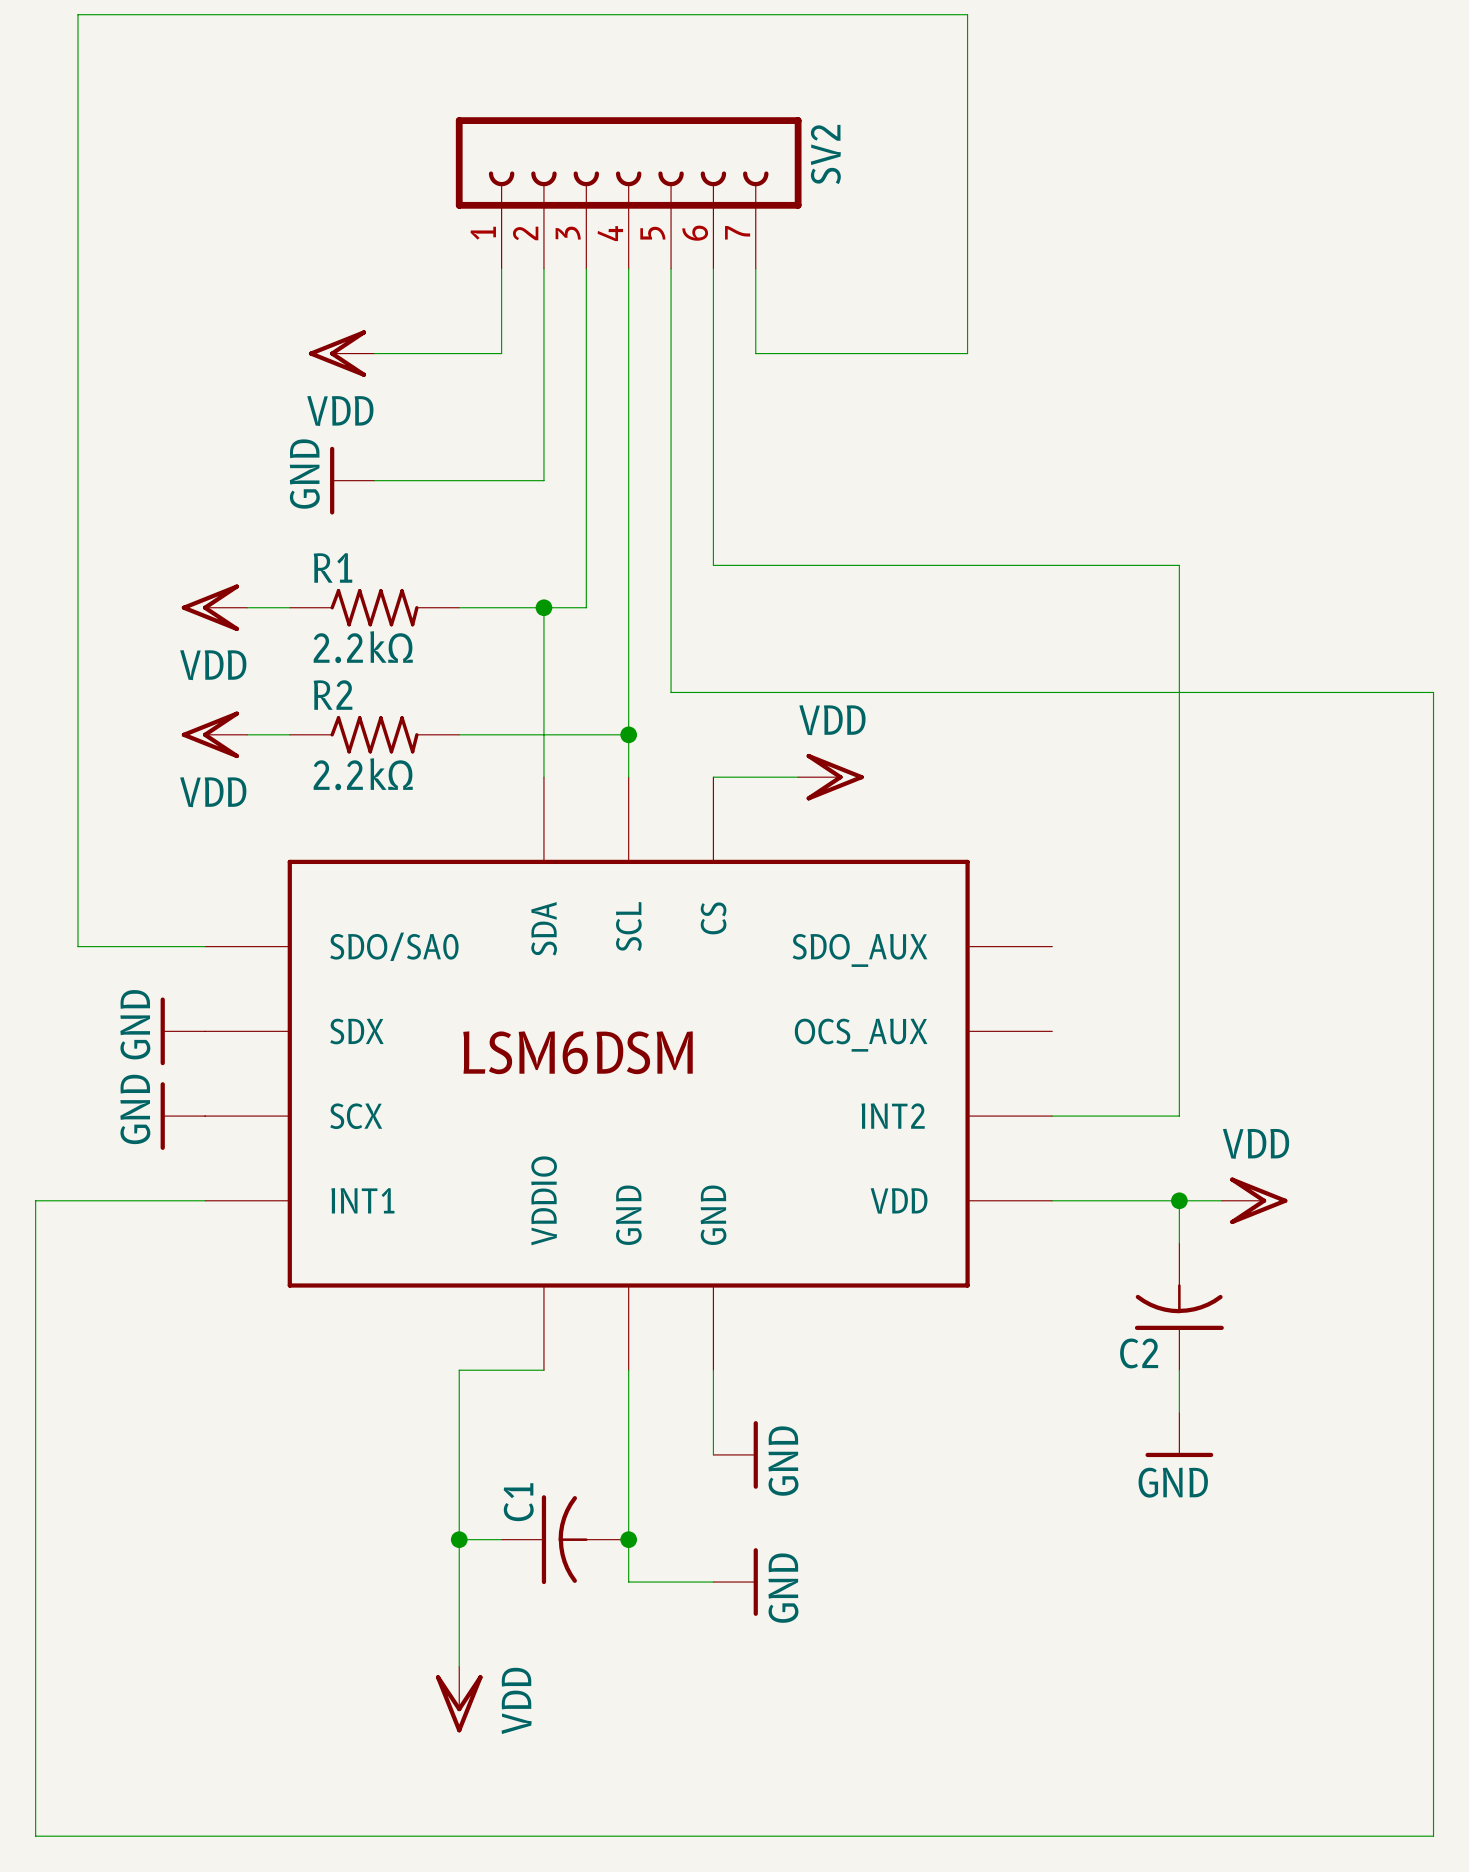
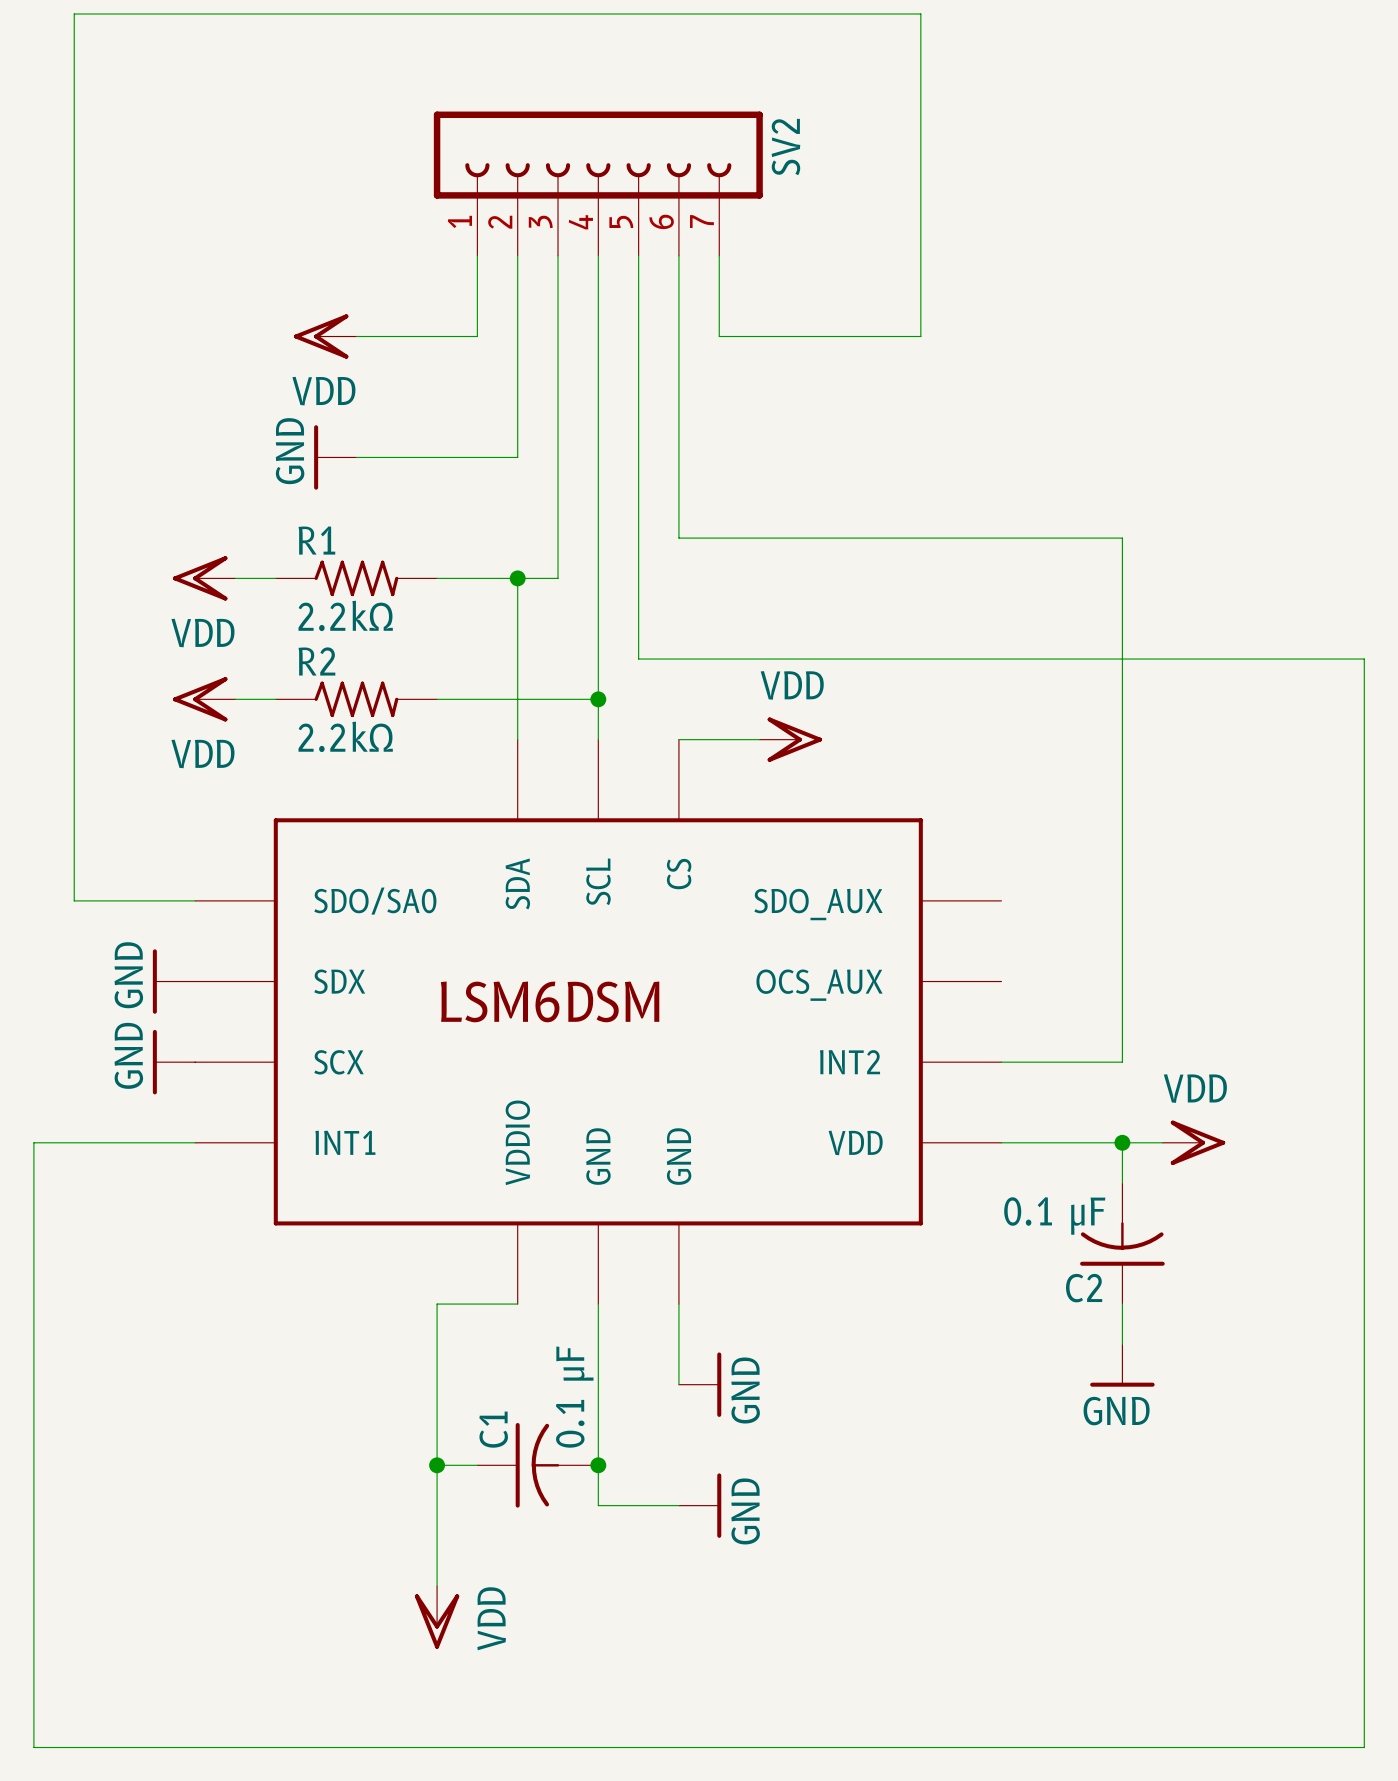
C2 value: none -> 0.1 μF (1054, 1215)
C1 value: none -> 0.1 μF (574, 1397)

